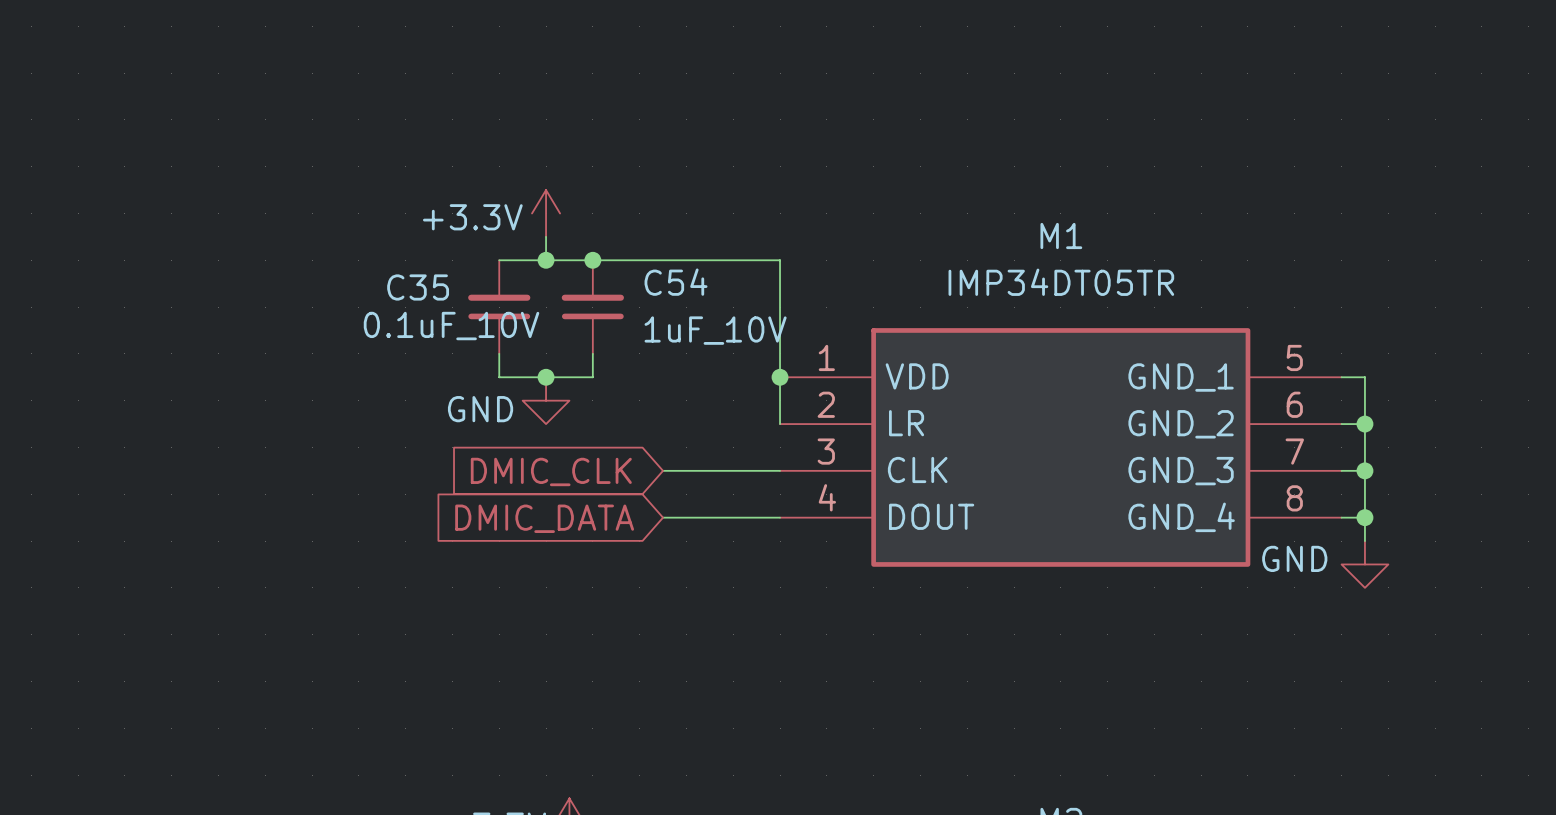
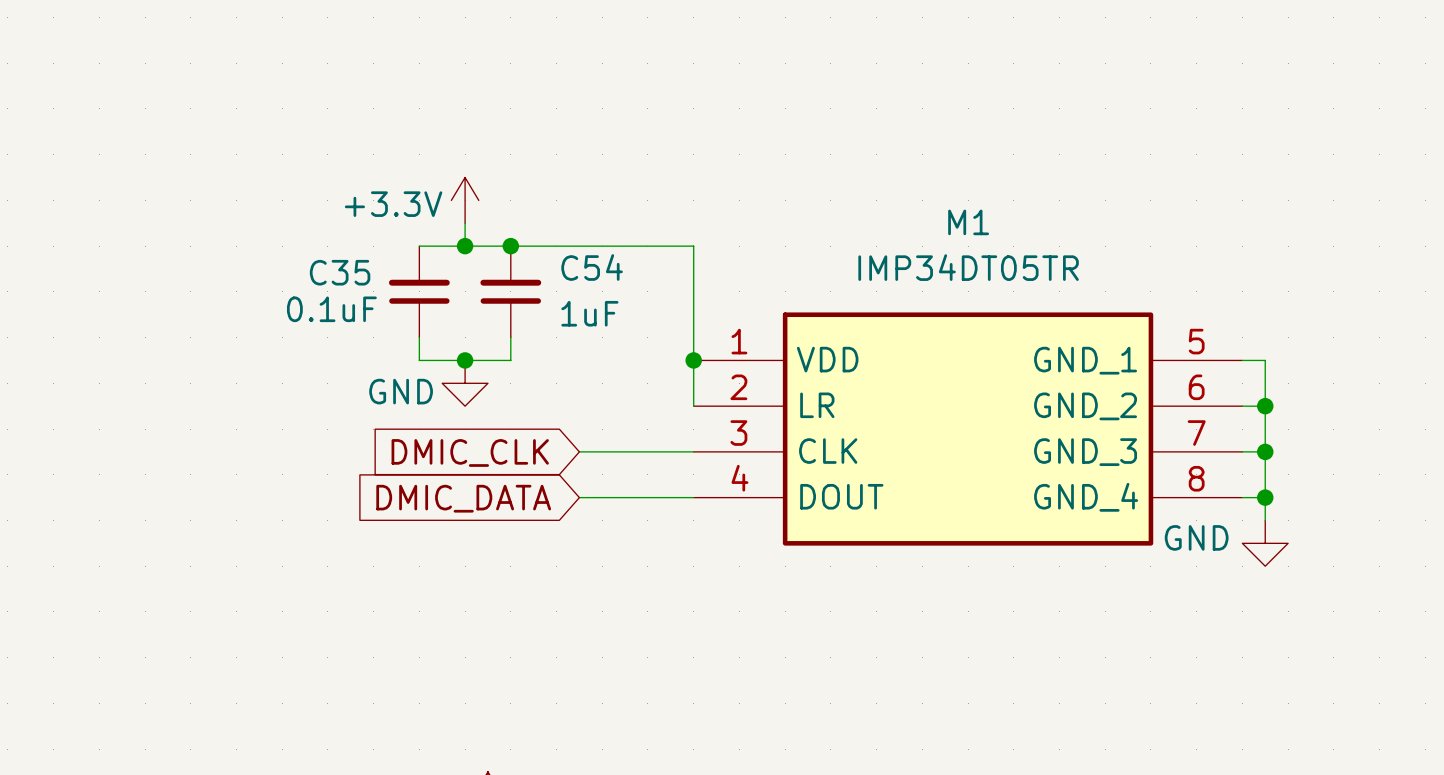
C35 value: 0.1uF_10V (451, 326) -> 0.1uF (331, 309)
C54 value: 1uF_10V (715, 330) -> 1uF (589, 313)

